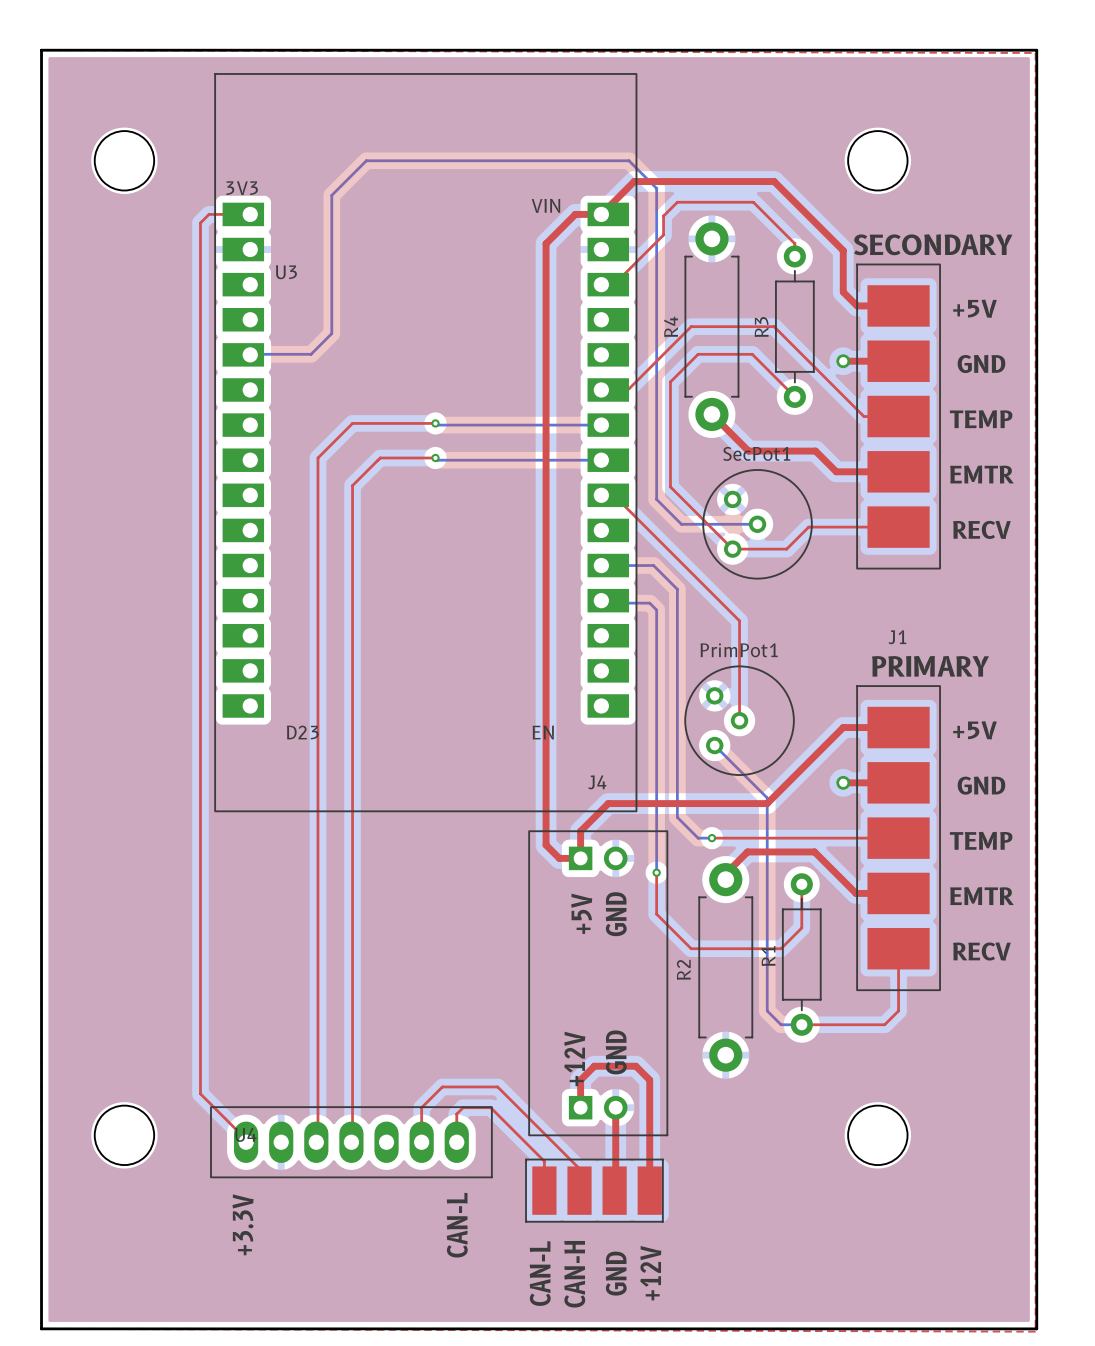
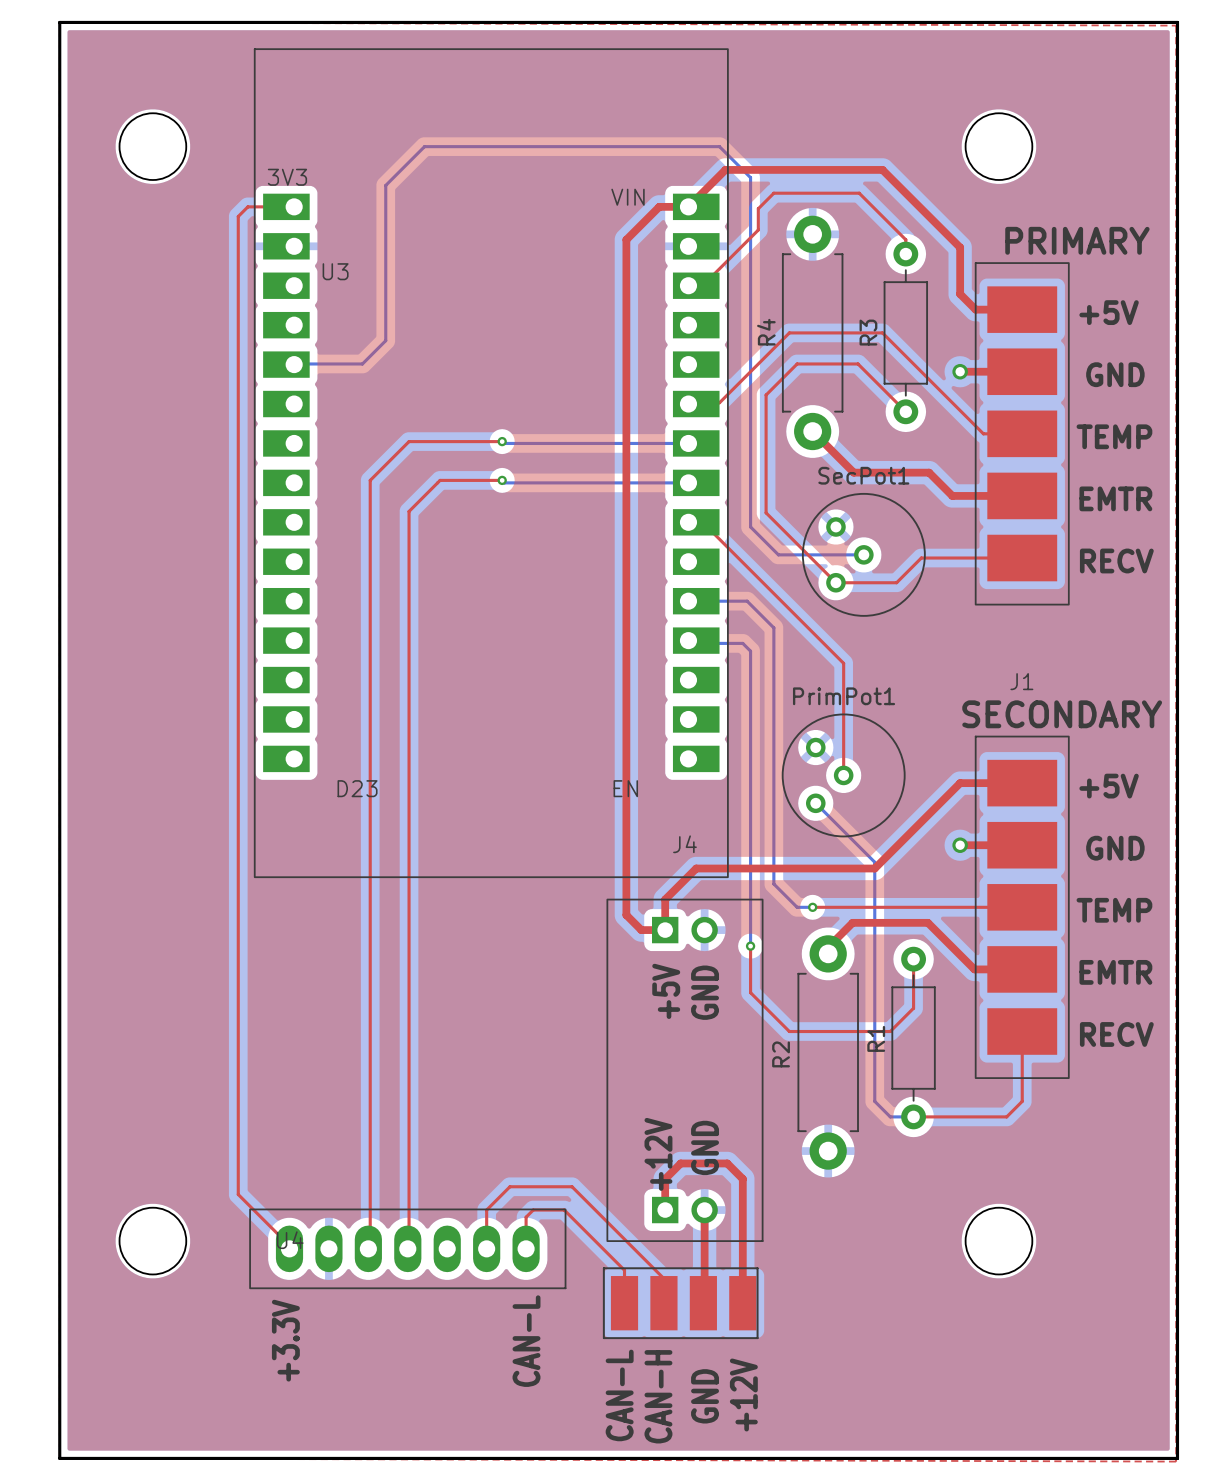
text: SECONDARY (933, 244) -> none
text: none -> PRIMARY (1077, 240)
text: PRIMARY (930, 666) -> none
text: none -> SECONDARY (1062, 714)

